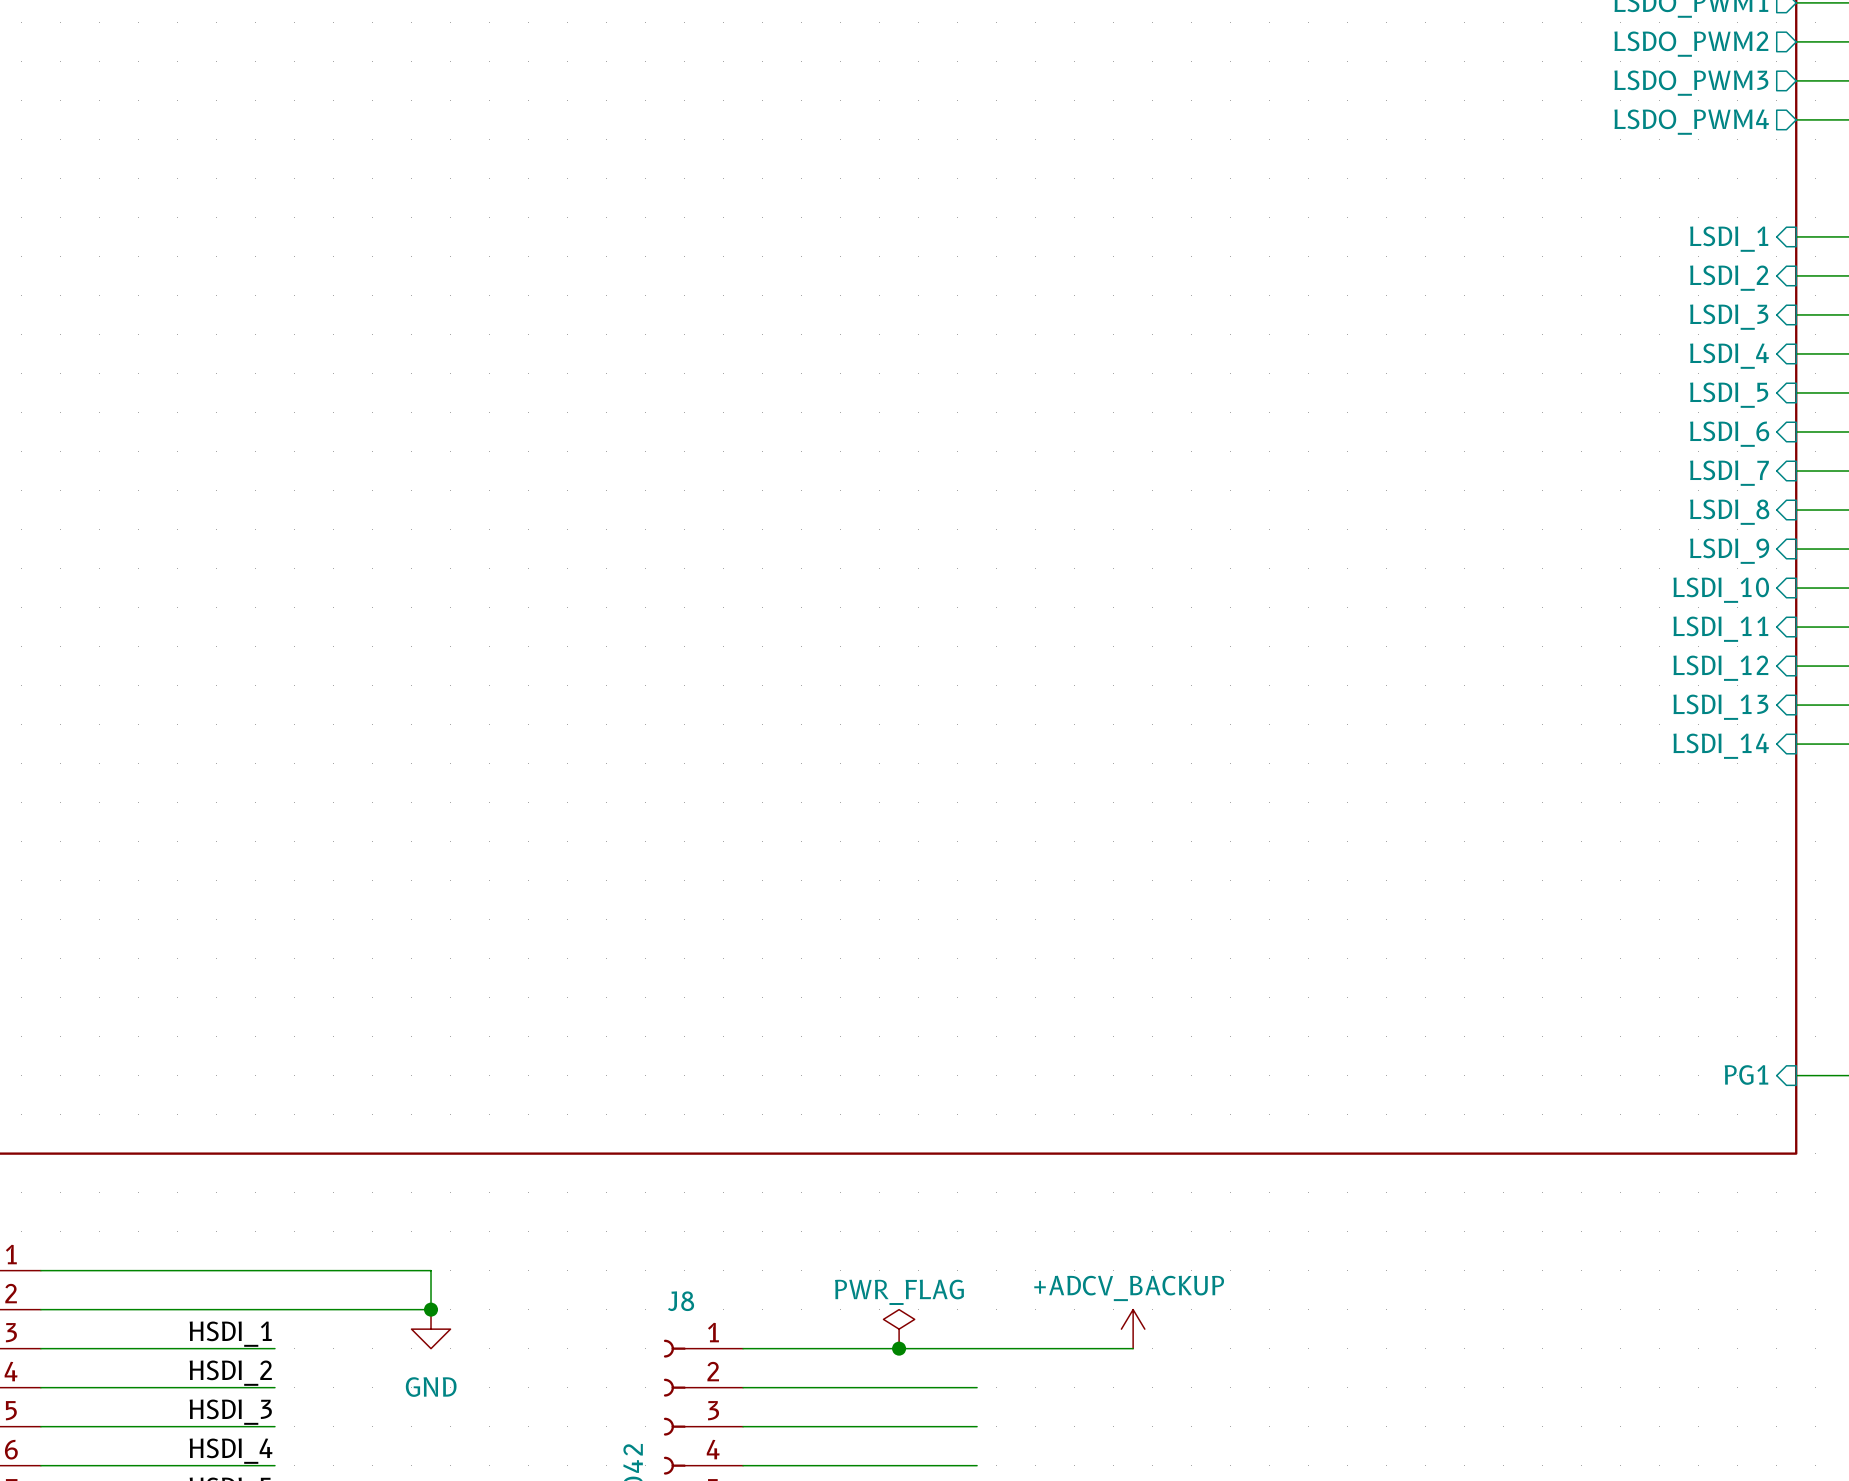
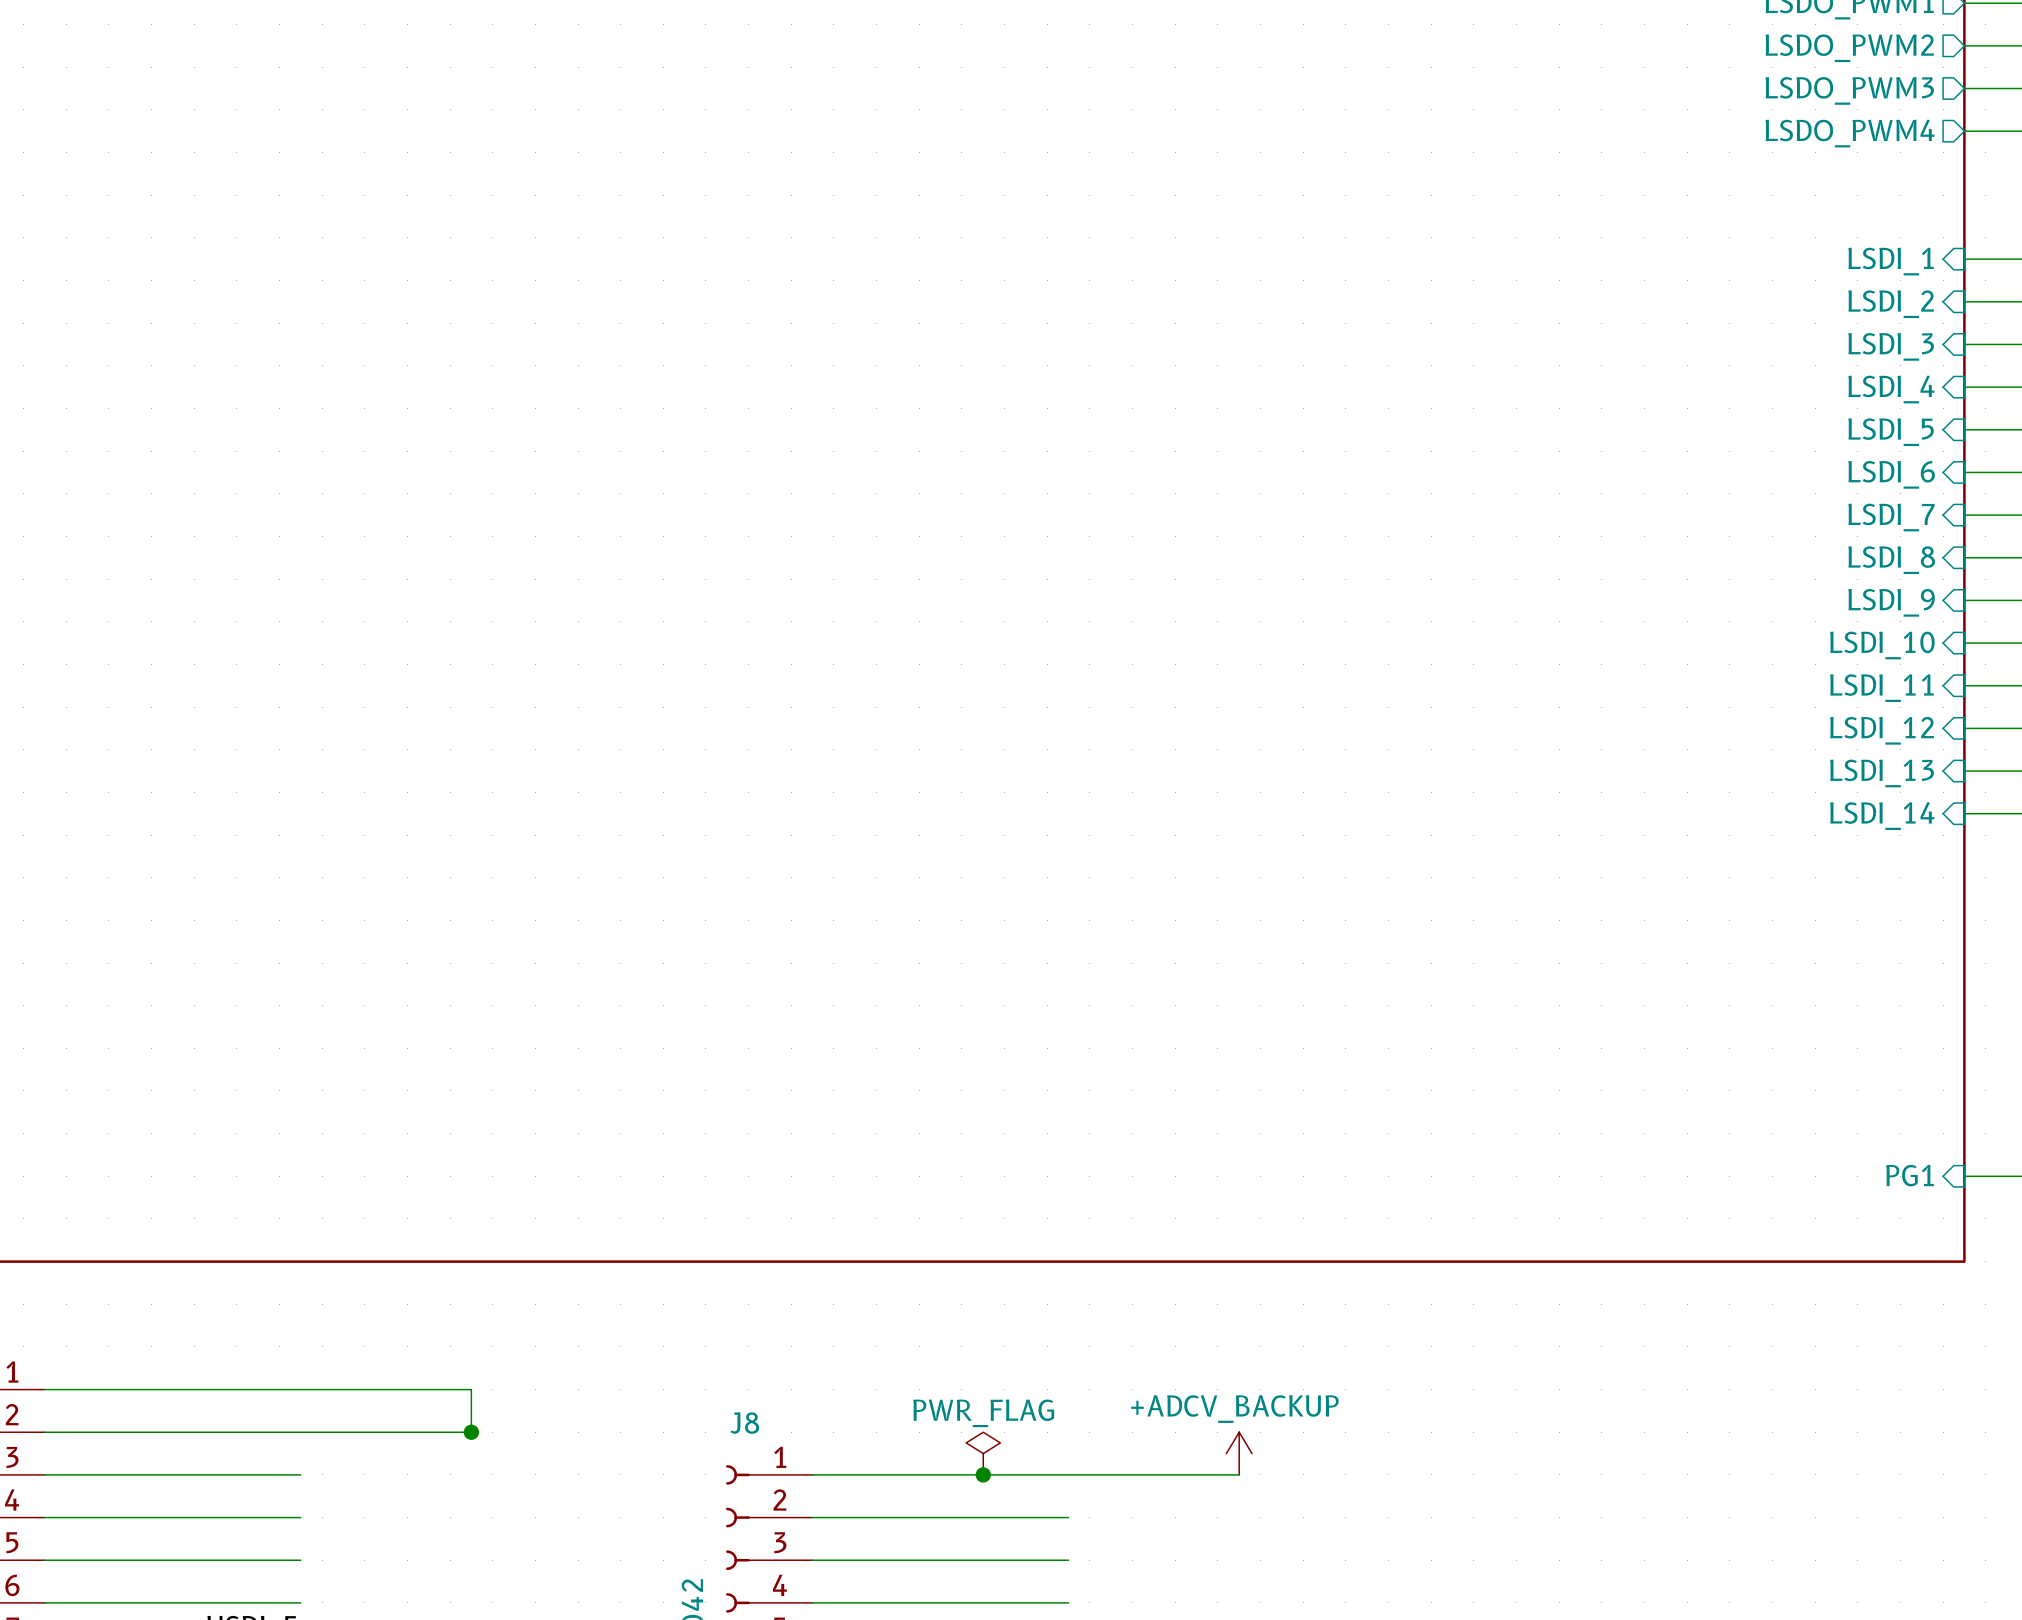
power symbol: GND (431, 1329) -> none
label: HSDI_1 (230, 1334) -> none
label: HSDI_2 (230, 1373) -> none
label: HSDI_3 (230, 1412) -> none
label: HSDI_4 (231, 1451) -> none

